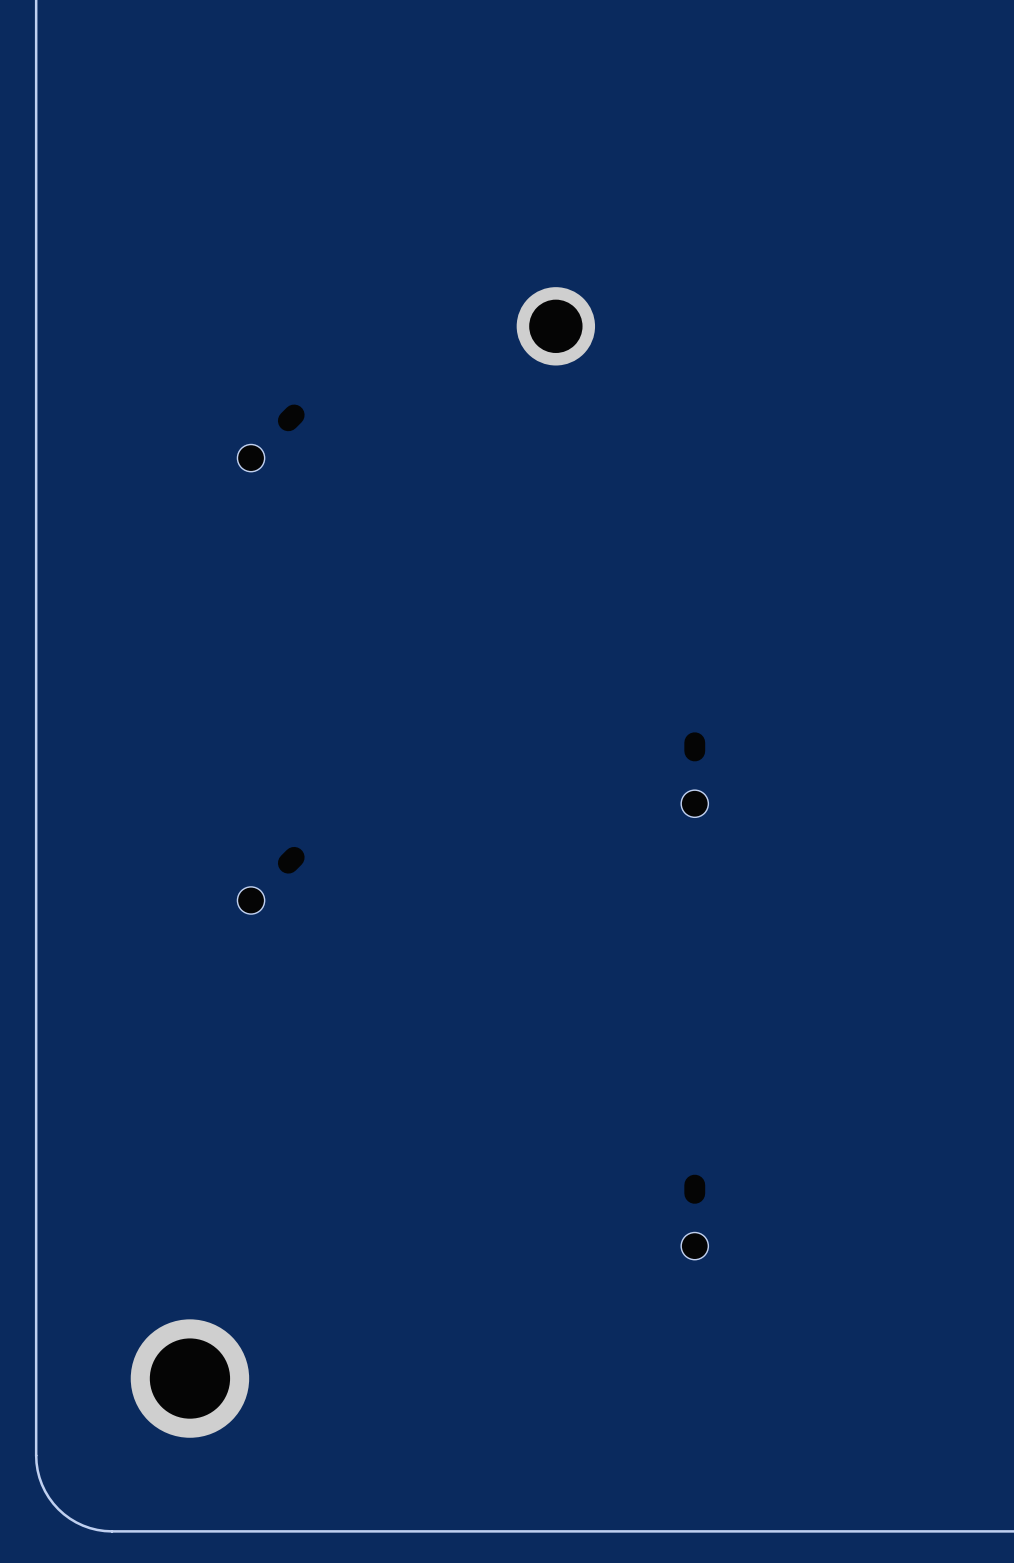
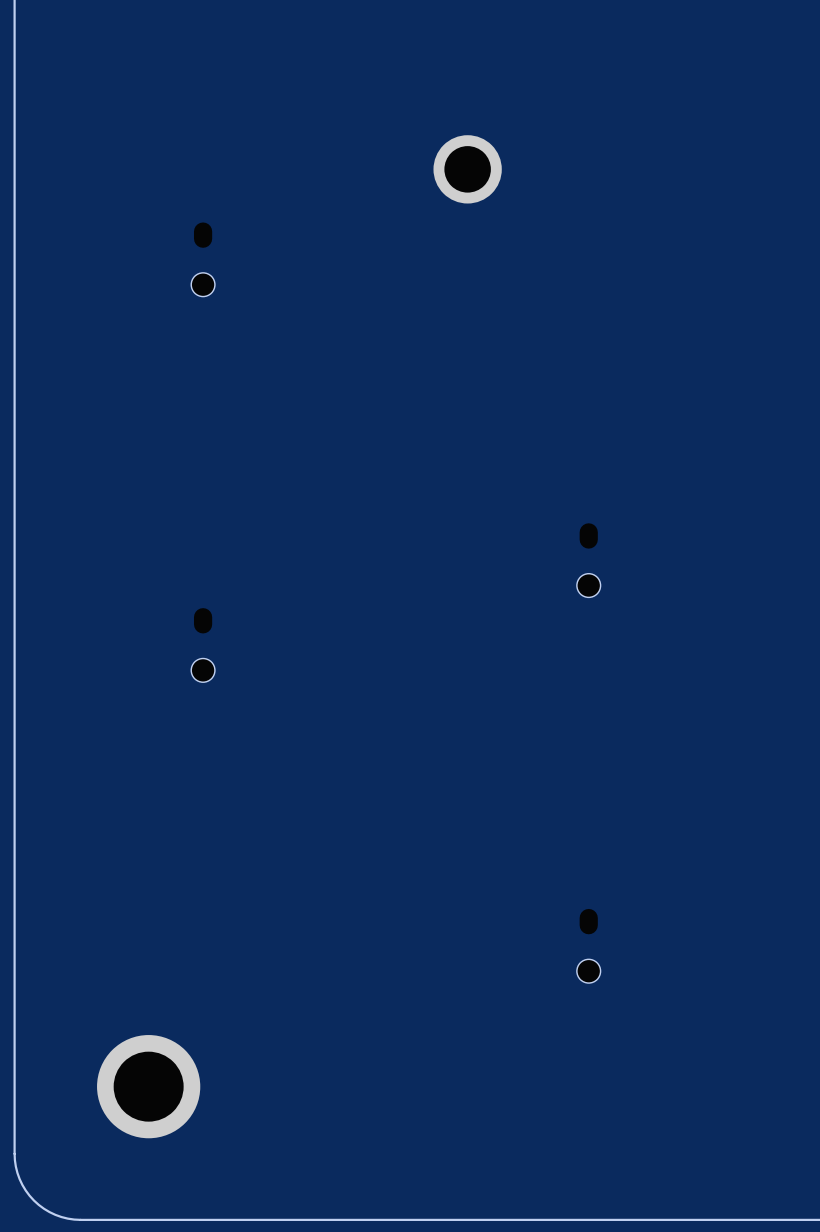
part: none -> (203, 259)
part: (271, 438) -> none
part: none -> (203, 645)
part: (271, 880) -> none

